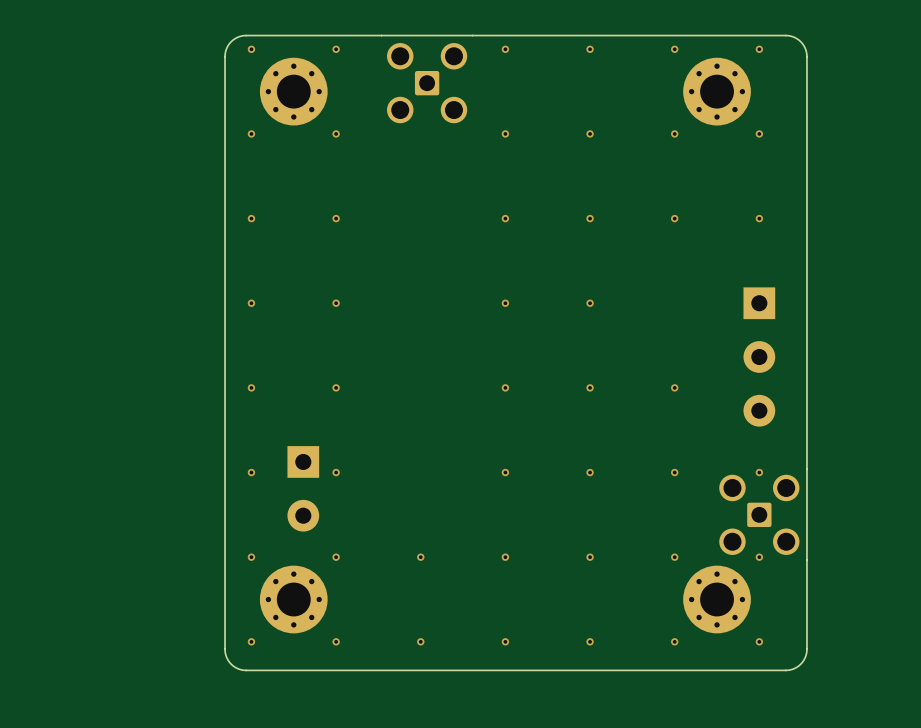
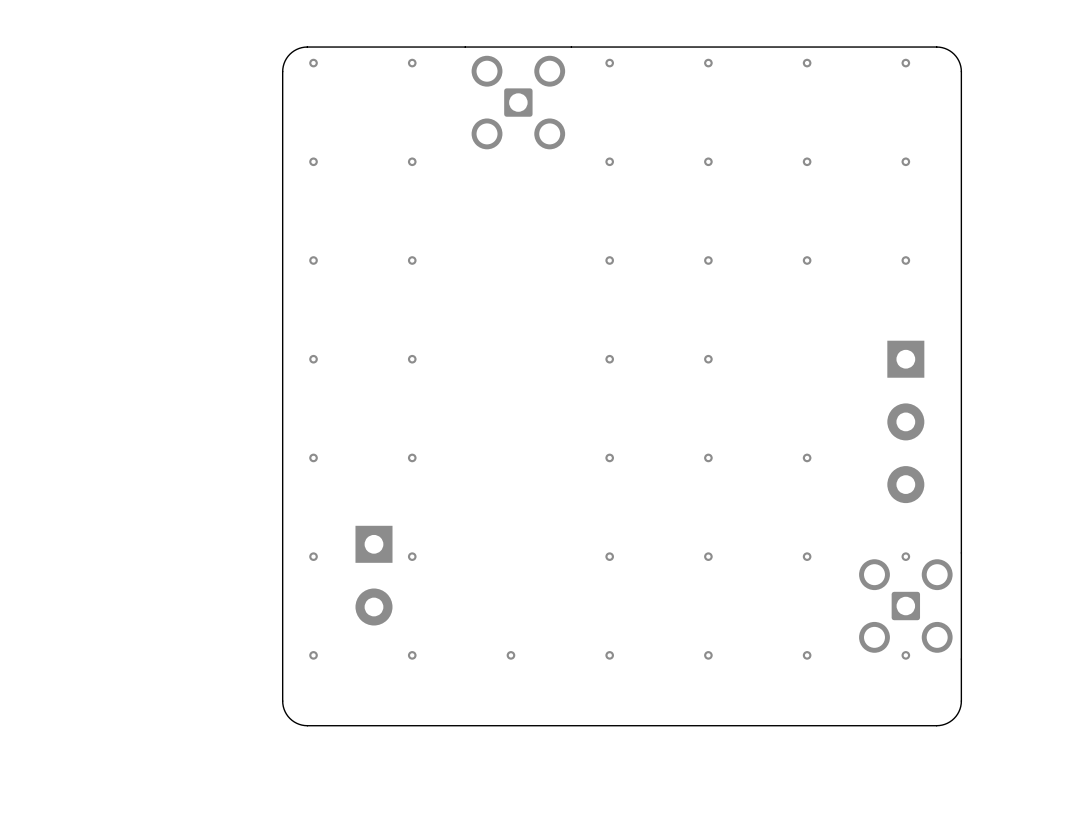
part: (293, 91) -> none
part: (717, 91) -> none
board edge: (806, 596) (806, 653) (799, 665) (785, 670) (243, 670) (232, 665) (225, 653) (225, 596) -> (961, 701) (959, 709) (954, 718) (944, 724) (936, 725) (307, 725) (299, 724) (289, 718) (284, 709) (282, 701)
part: (293, 599) -> none
part: (717, 599) -> none
via: (251, 641) -> none
via: (336, 641) -> none
via: (420, 641) -> none
via: (505, 641) -> none
via: (590, 641) -> none
via: (674, 641) -> none
via: (759, 641) -> none

